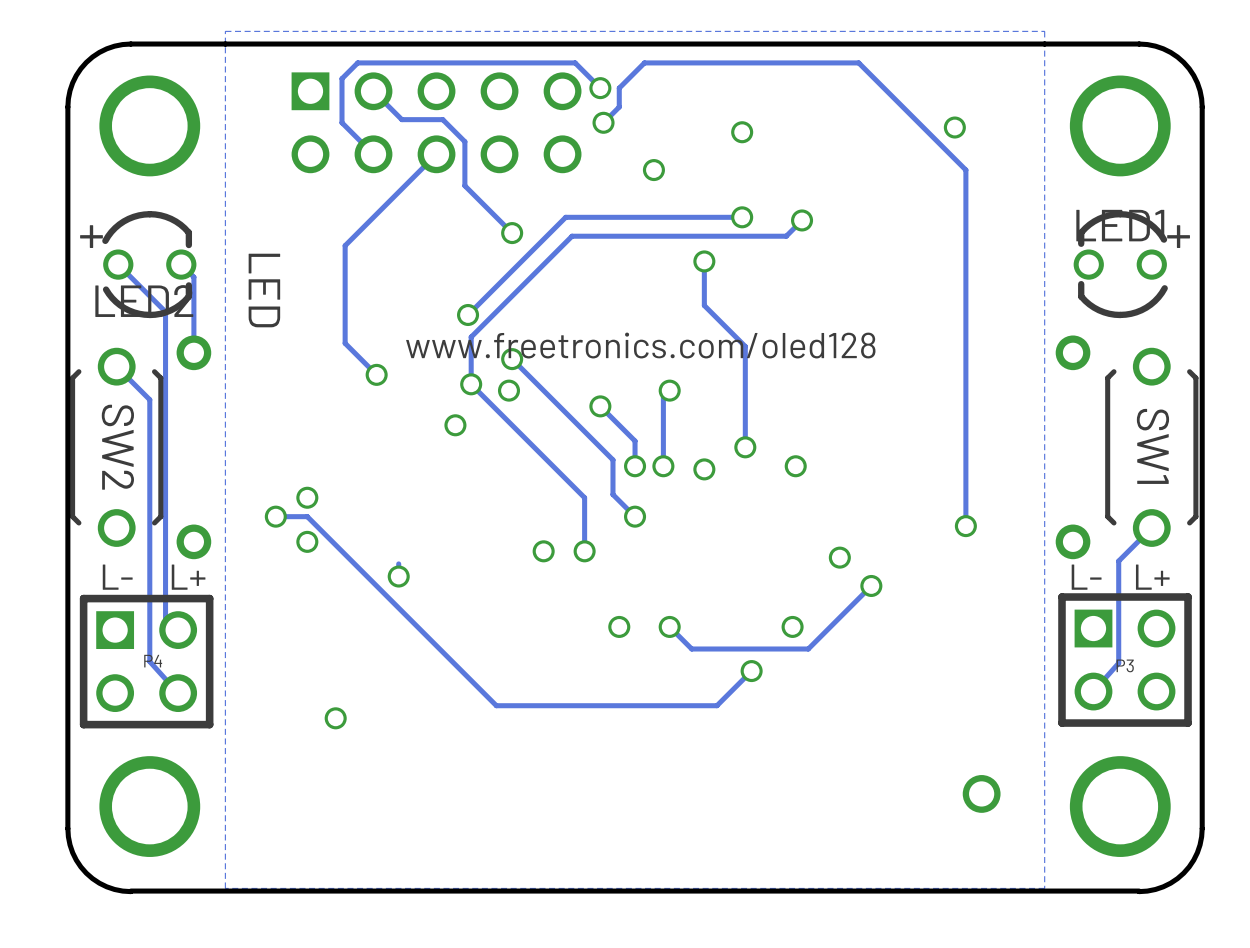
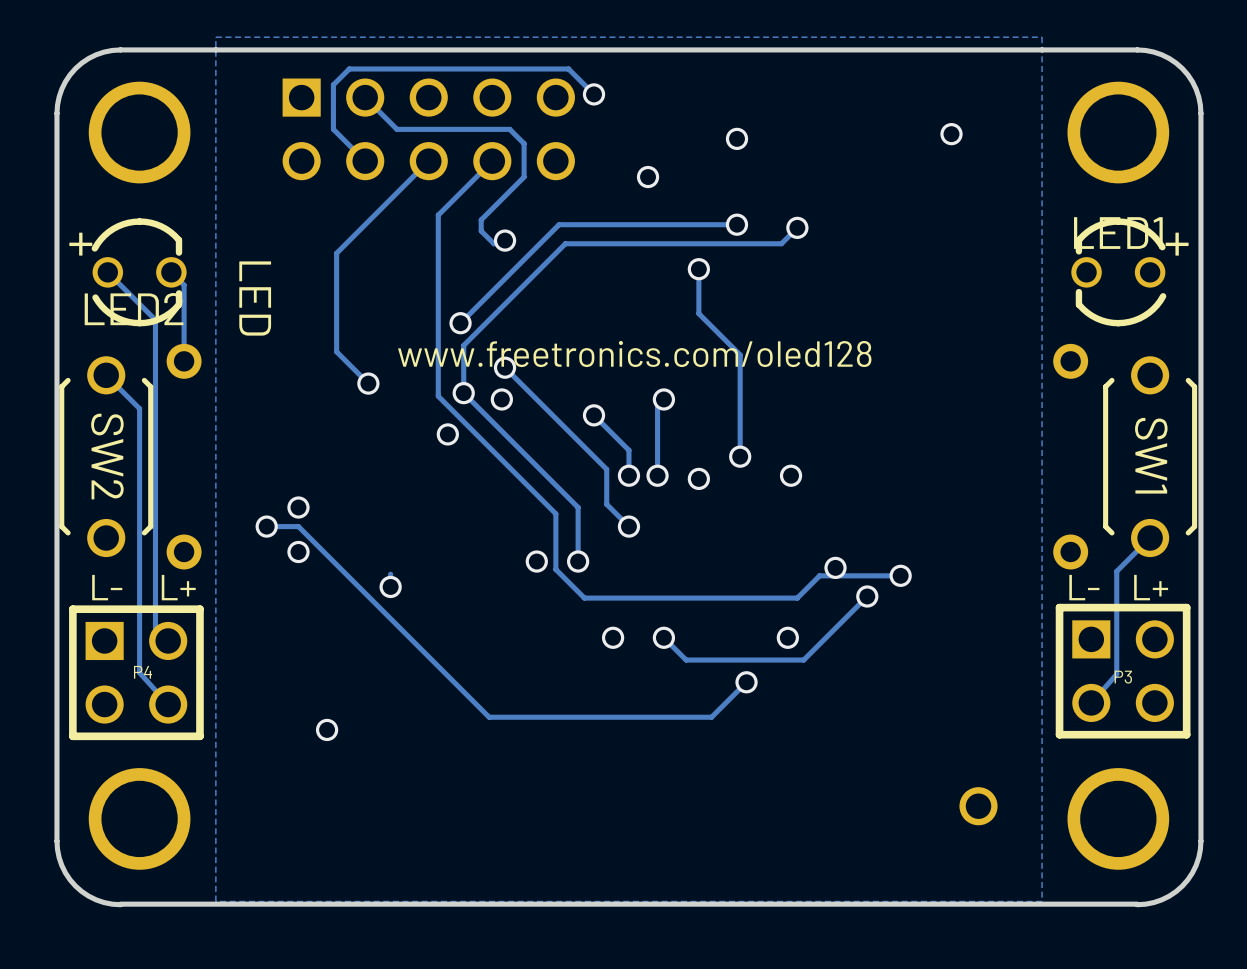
track: (401, 119) (442, 119) (464, 141) (464, 185) (512, 233) -> (393, 126) (396, 129) (509, 129) (524, 143) (524, 177) (481, 219) (481, 231) (493, 243) (501, 243)
track: (603, 122) (619, 107) (619, 88) (644, 62) (858, 62) (965, 170) (965, 526) -> none
via: (603, 122) -> none
track: none -> (492, 161) (438, 215) (438, 396) (555, 513) (555, 569) (584, 598) (797, 598) (819, 575) (900, 575)
via position: (965, 526) -> (900, 575)

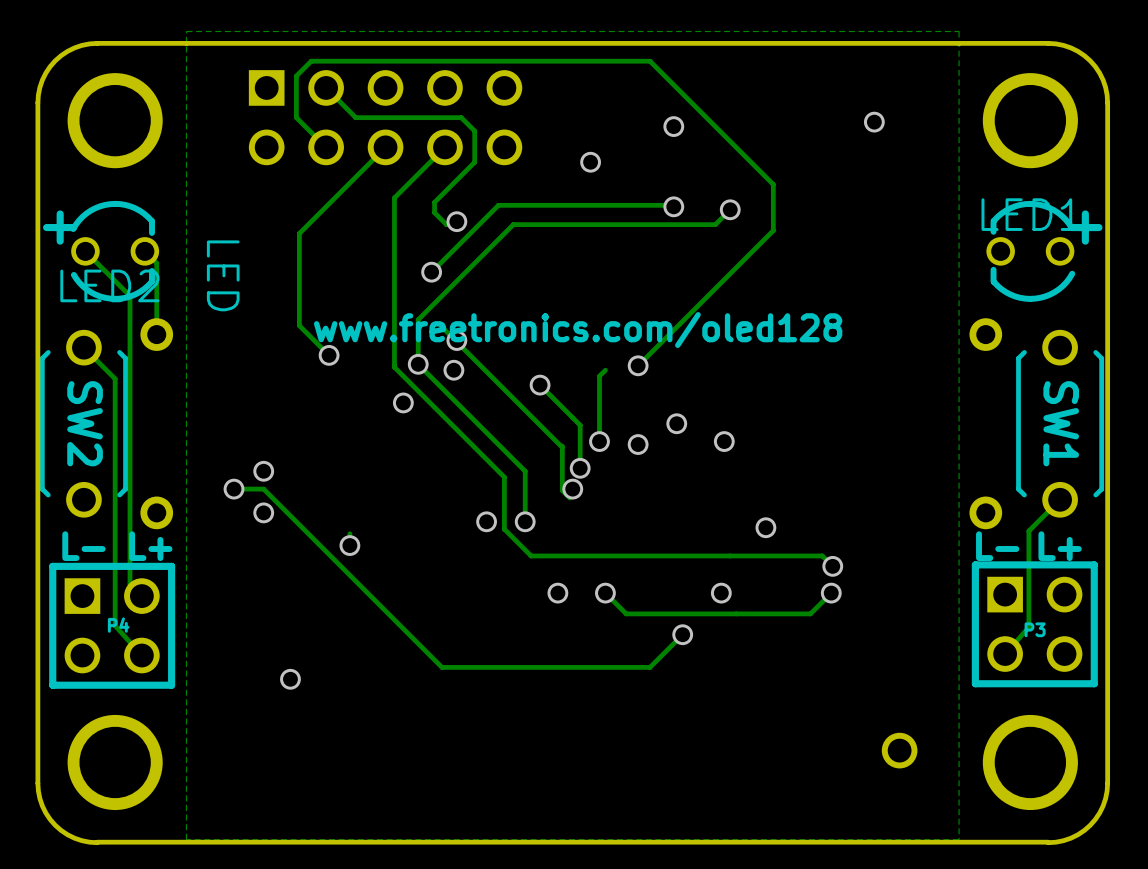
track: (568, 68) (594, 94) -> (516, 61) (650, 61) (773, 184) (773, 230) (638, 365)
via: (594, 94) -> none
track: none -> (670, 205) (498, 205) (431, 272)
track: (737, 224) (559, 224) (460, 323) -> none
track: (698, 269) (698, 313) (740, 354) (740, 456) -> none
via: (698, 269) -> none
via position: (460, 323) -> (431, 272)
track: none -> (440, 325) (562, 447)
track: (505, 367) (606, 469) (606, 504) (628, 526) -> none
via position: (663, 399) -> (638, 365)
track: (628, 450) (628, 475) -> (572, 417) (580, 425) (580, 468)
via position: (628, 475) -> (580, 468)
track: none -> (562, 446) (562, 490) (569, 498)
track: (900, 575) (819, 575) (797, 598) -> (832, 566) (822, 555) (730, 555)
via: (900, 575) -> none
track: (867, 596) (803, 660) -> (831, 593) (810, 613) (736, 613)
via: (867, 596) -> none
via: none -> (832, 566)
via: none -> (831, 593)

